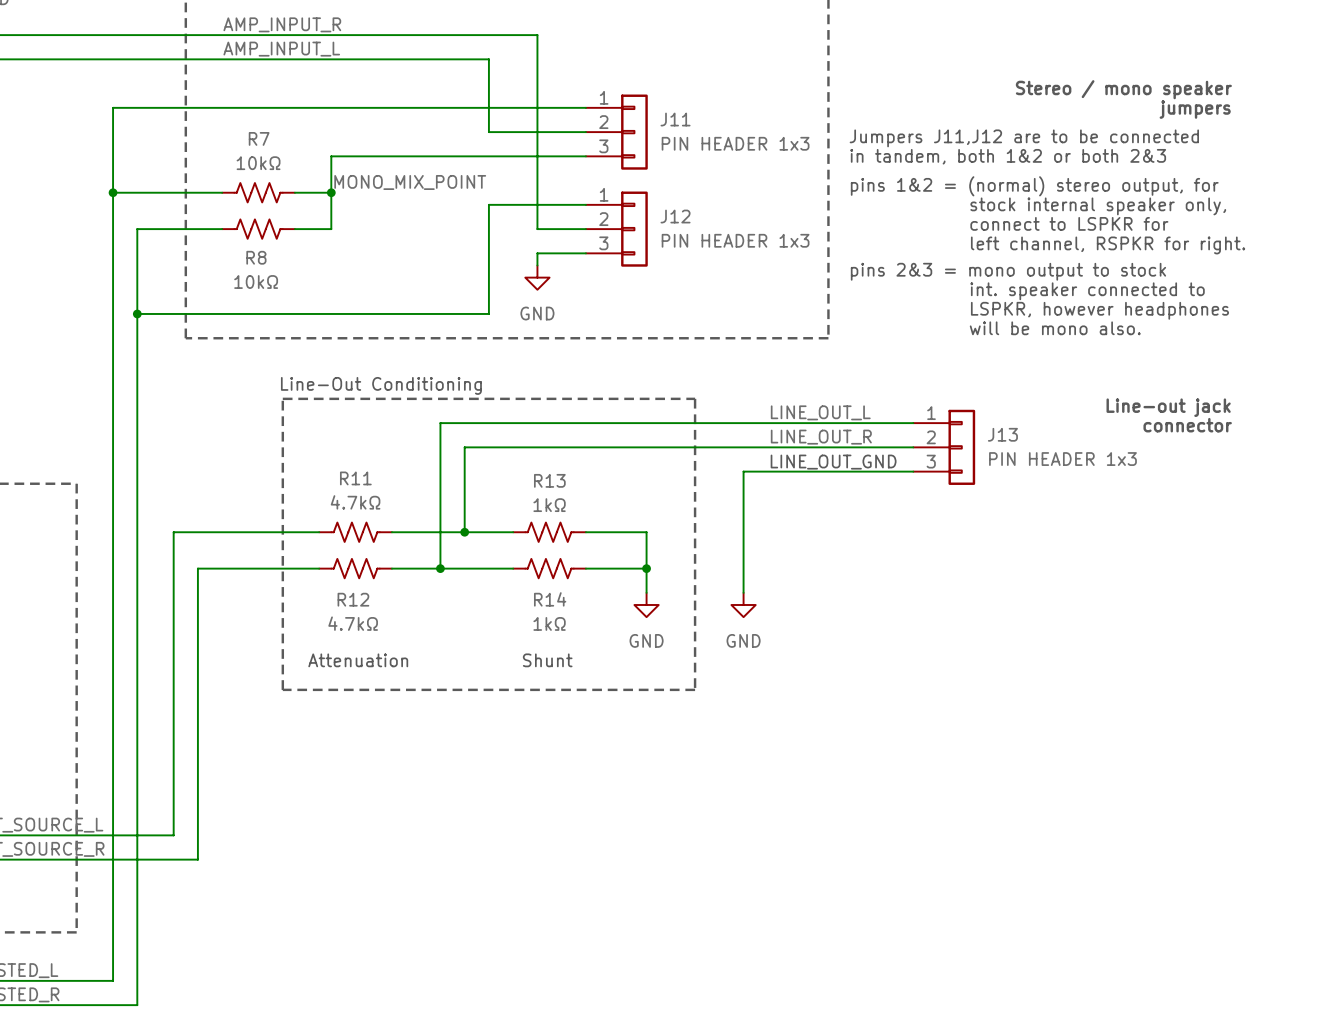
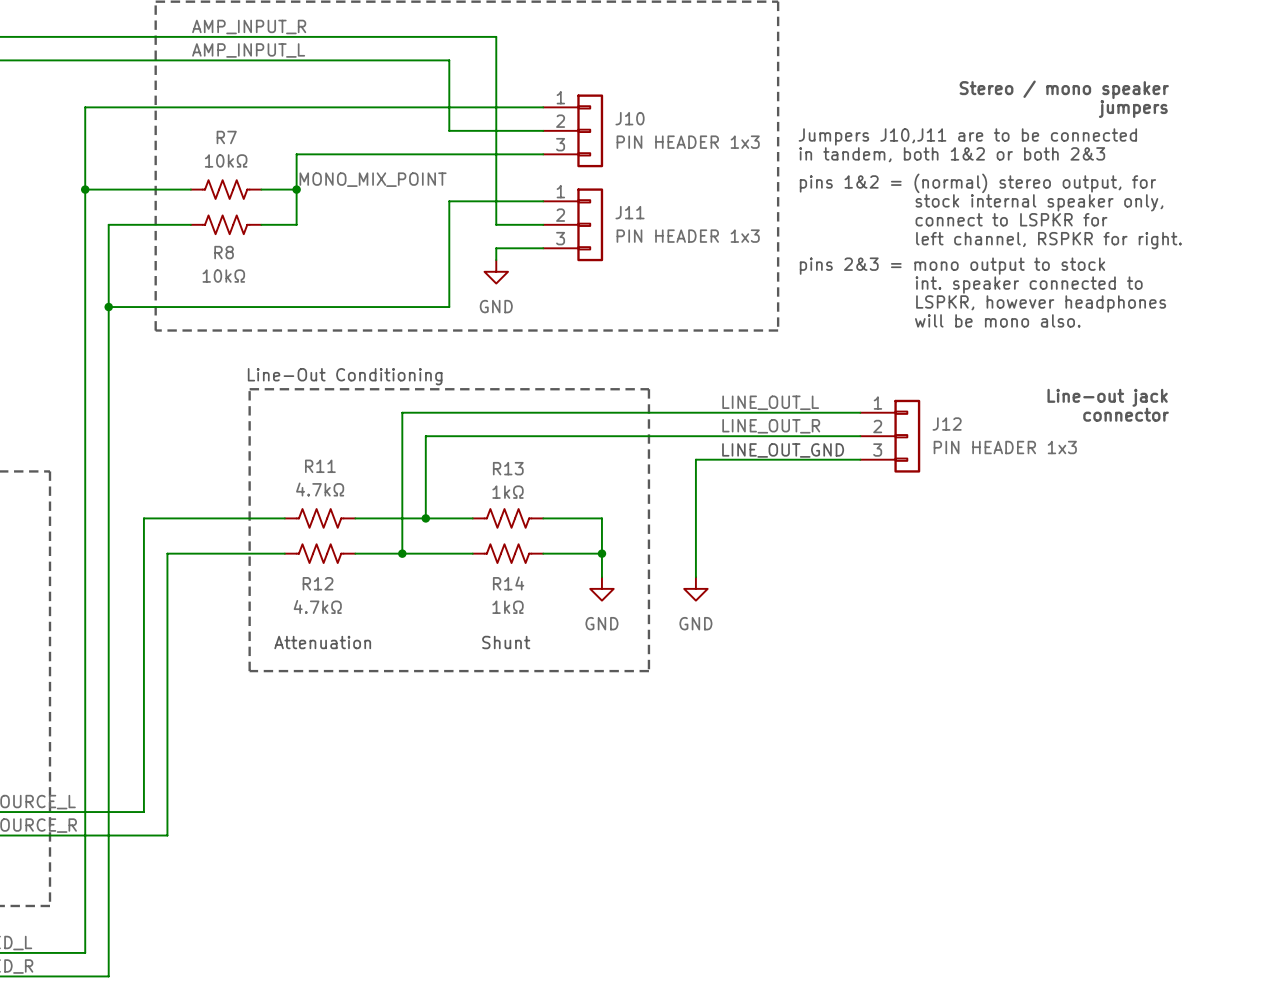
J11 name: J11 (675, 119) -> J10 (630, 118)
text: Jumpers J11,J12 are to be connected (1024, 138) -> Jumpers J10,J11 are to be connected (967, 136)
J12 name: J12 (675, 216) -> J11 (630, 212)
J13 name: J13 (1002, 434) -> J12 (947, 424)

